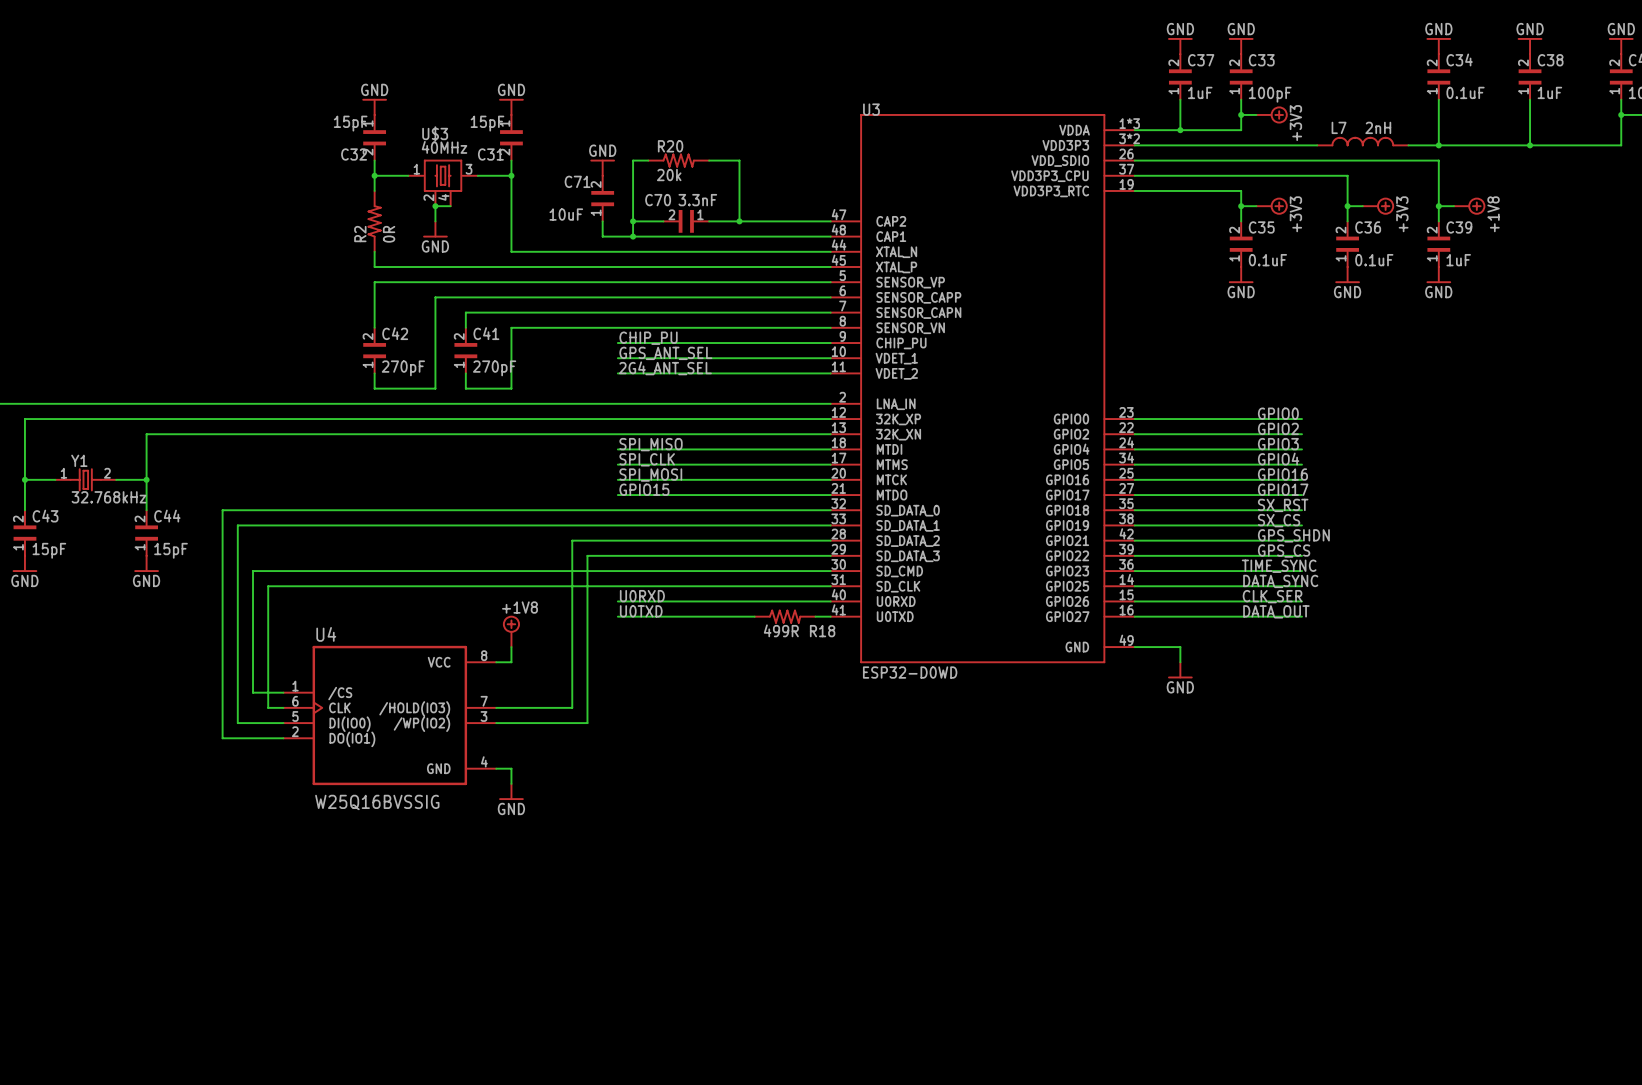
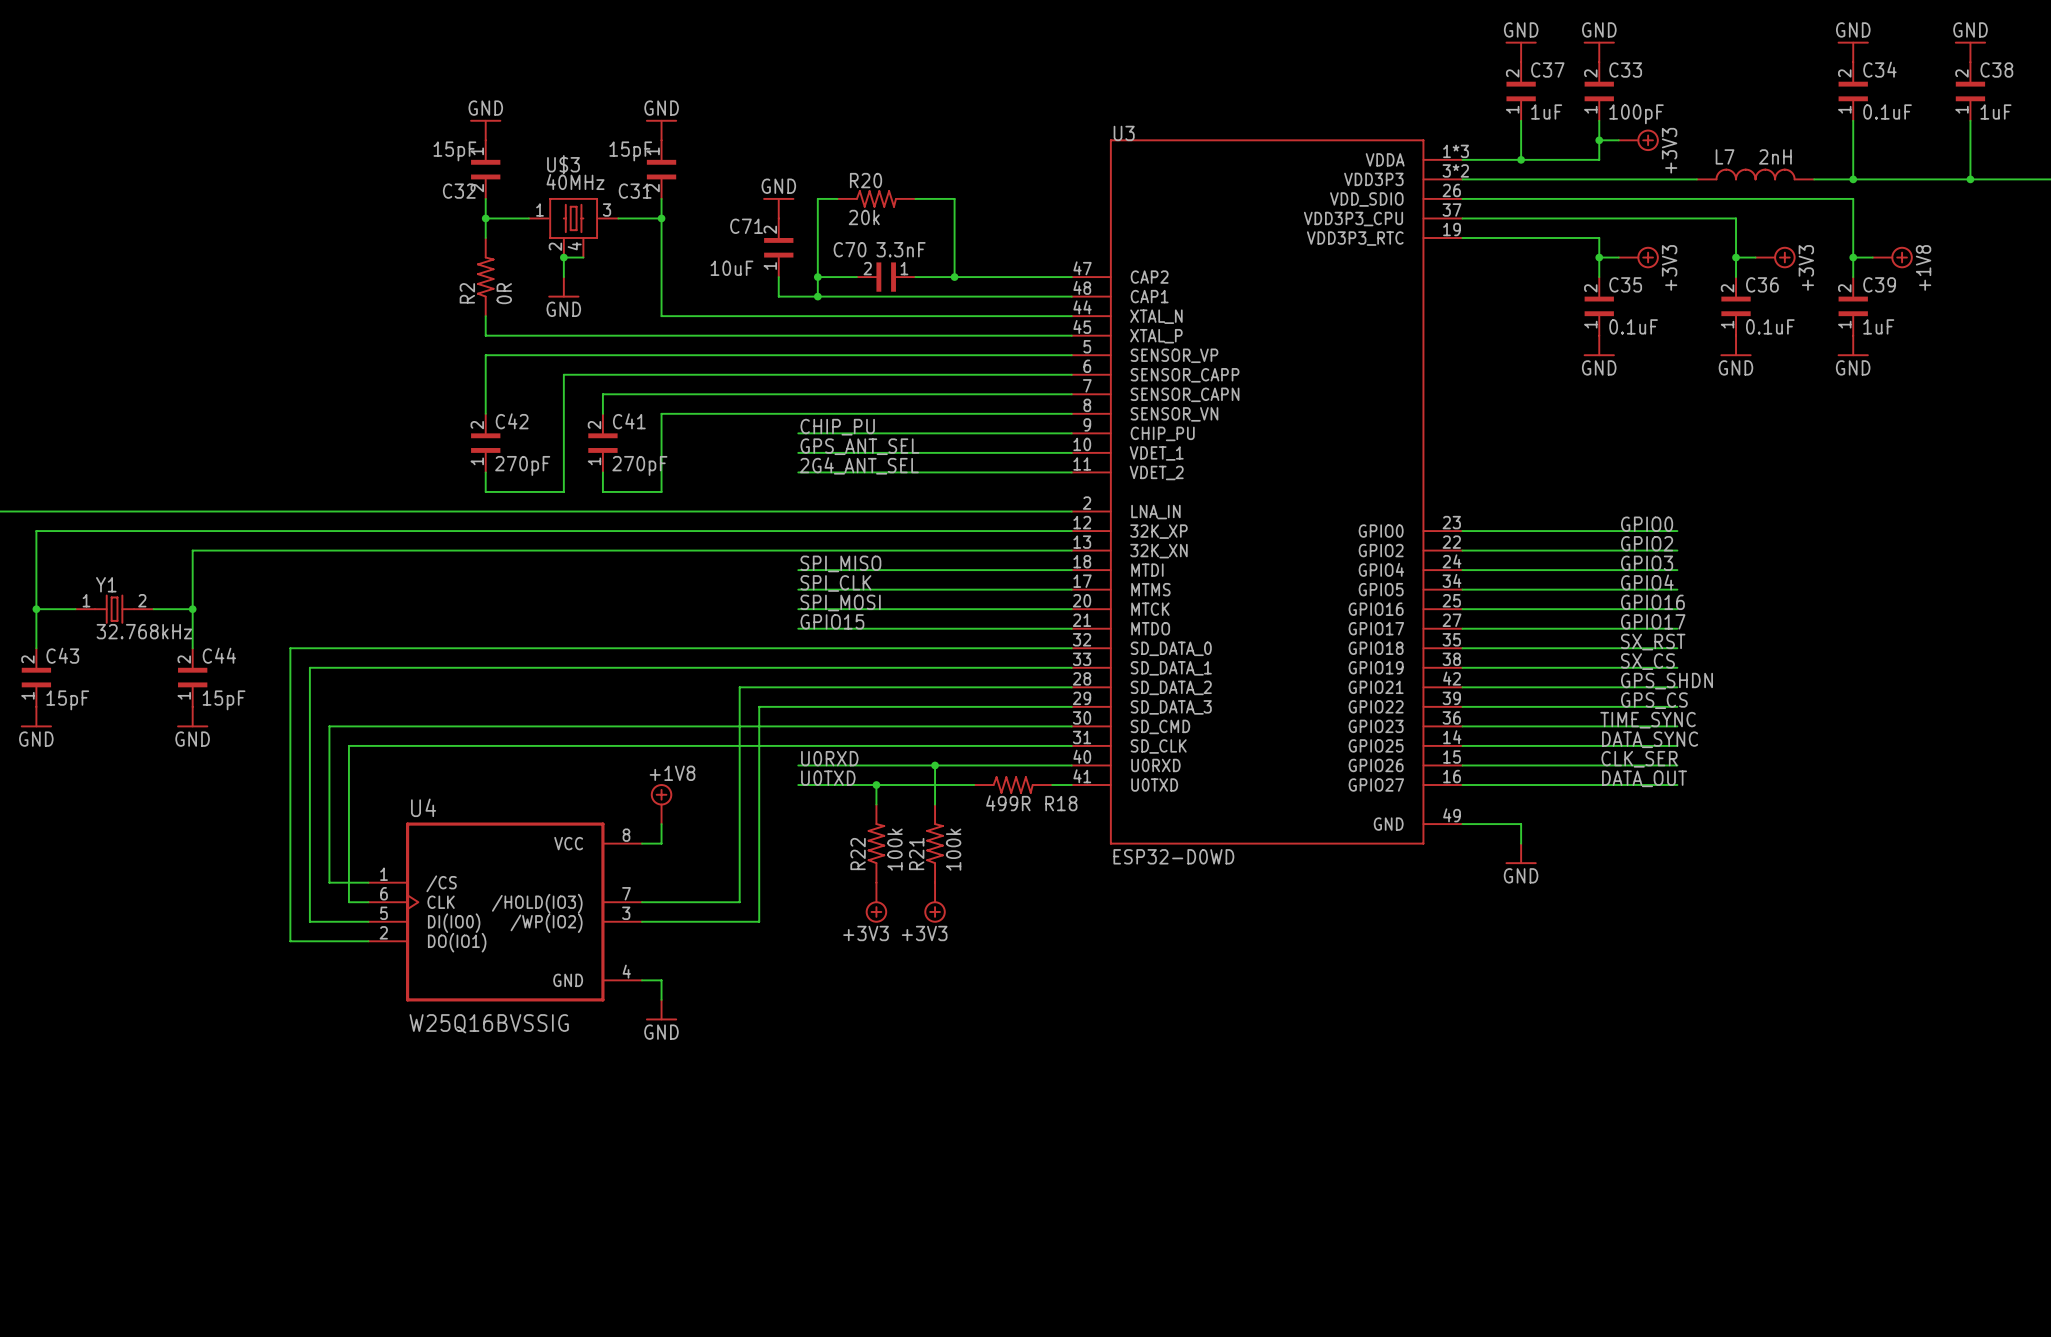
wire: none -> (935, 765) (935, 804)
junction: none -> (935, 765)
wire: none -> (876, 785) (876, 804)
junction: none -> (876, 785)
R22: none -> 100k (876, 843)
R21: none -> 100k (935, 843)
power symbol: none -> +3V3 (876, 902)
power symbol: none -> +3V3 (935, 902)

